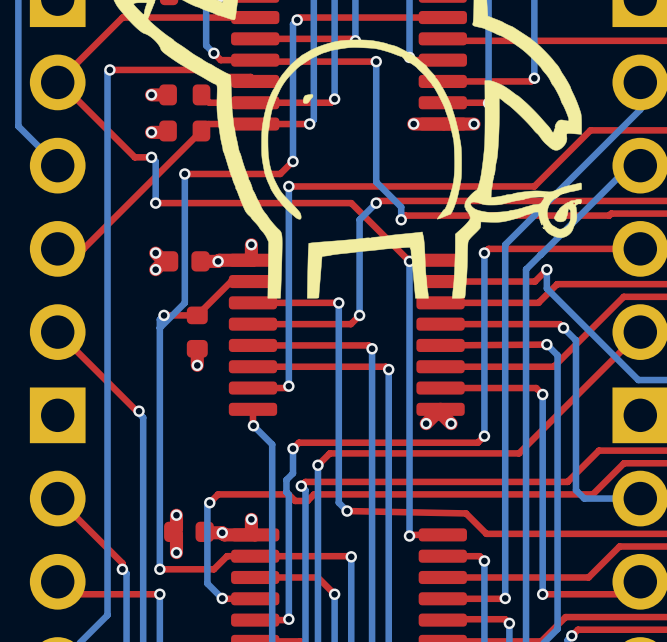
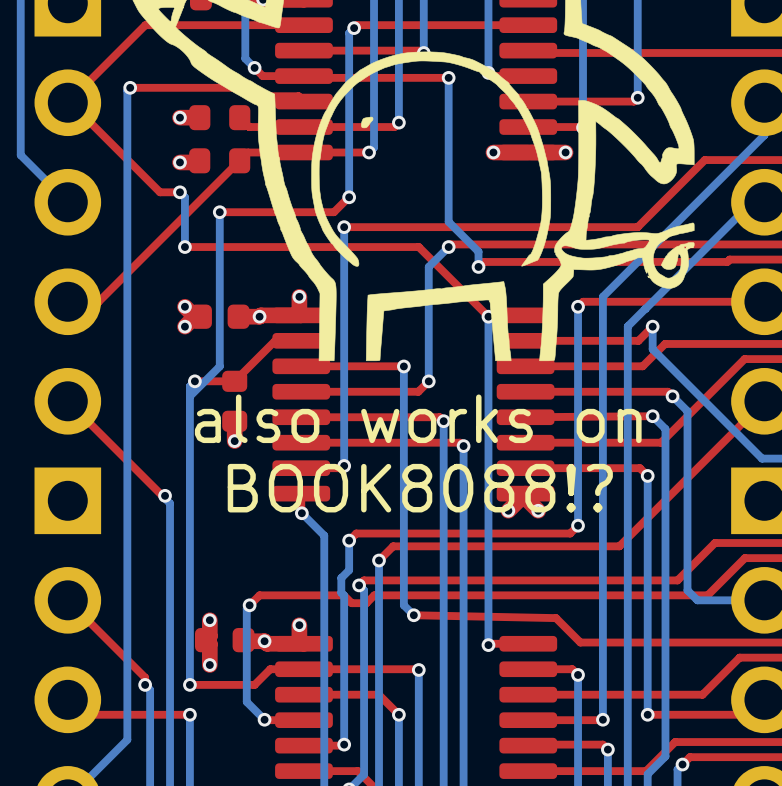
text: none -> also works on (418, 418)
text: none -> BOOK8088!? (420, 488)

